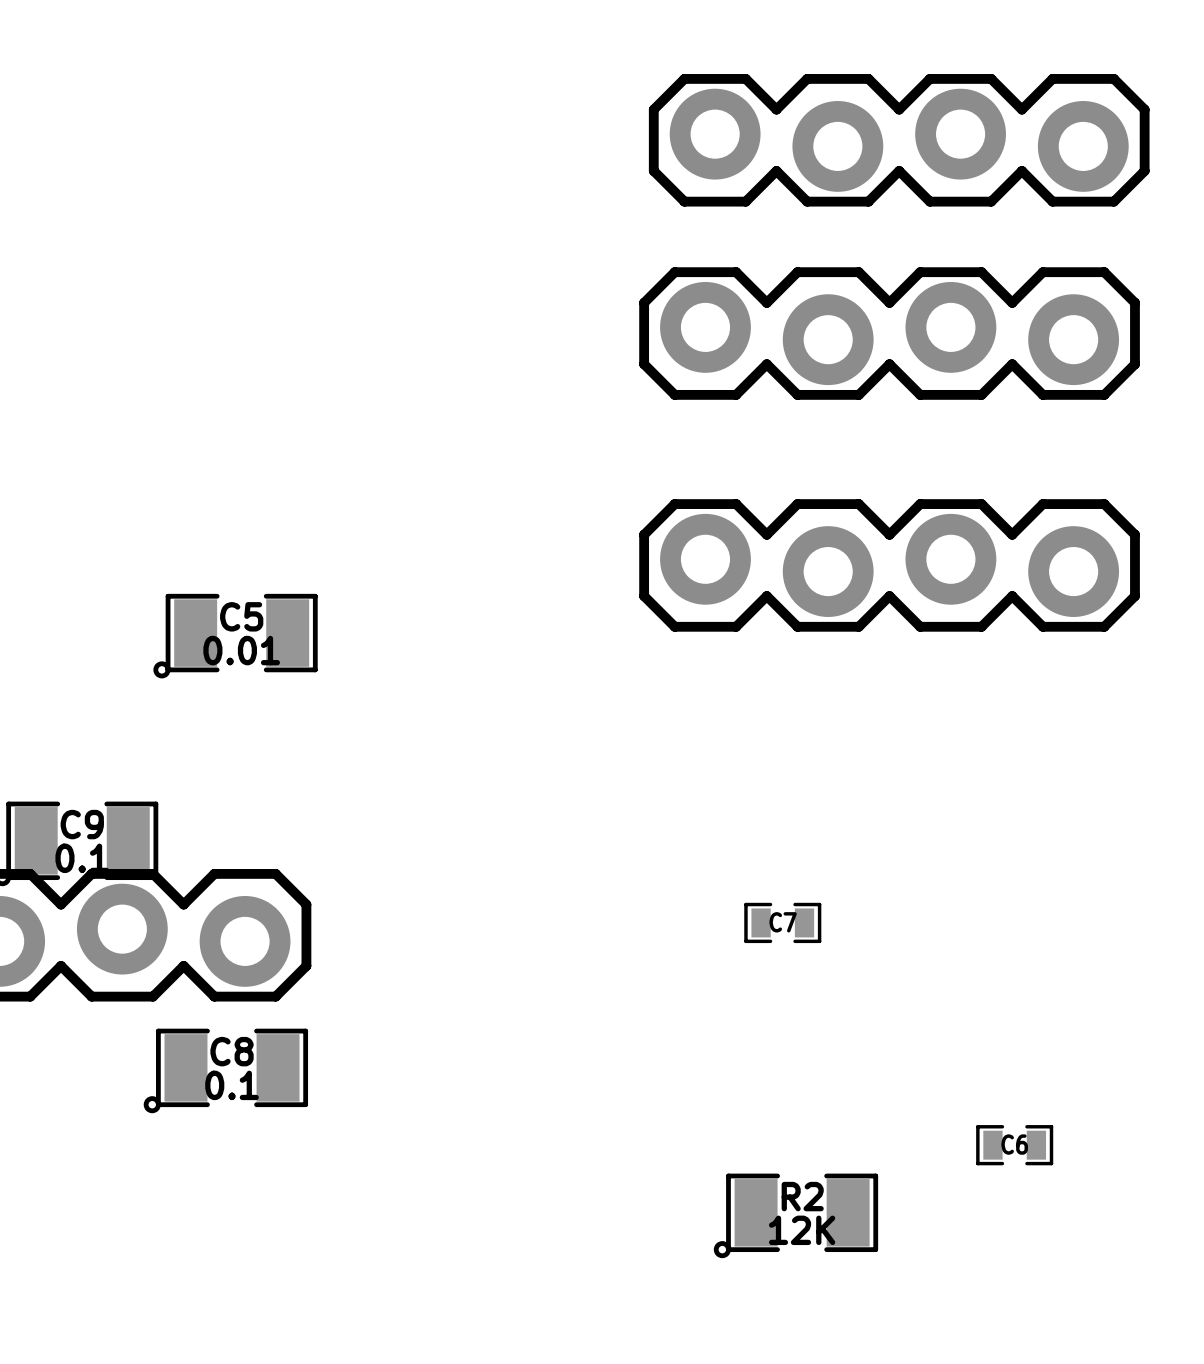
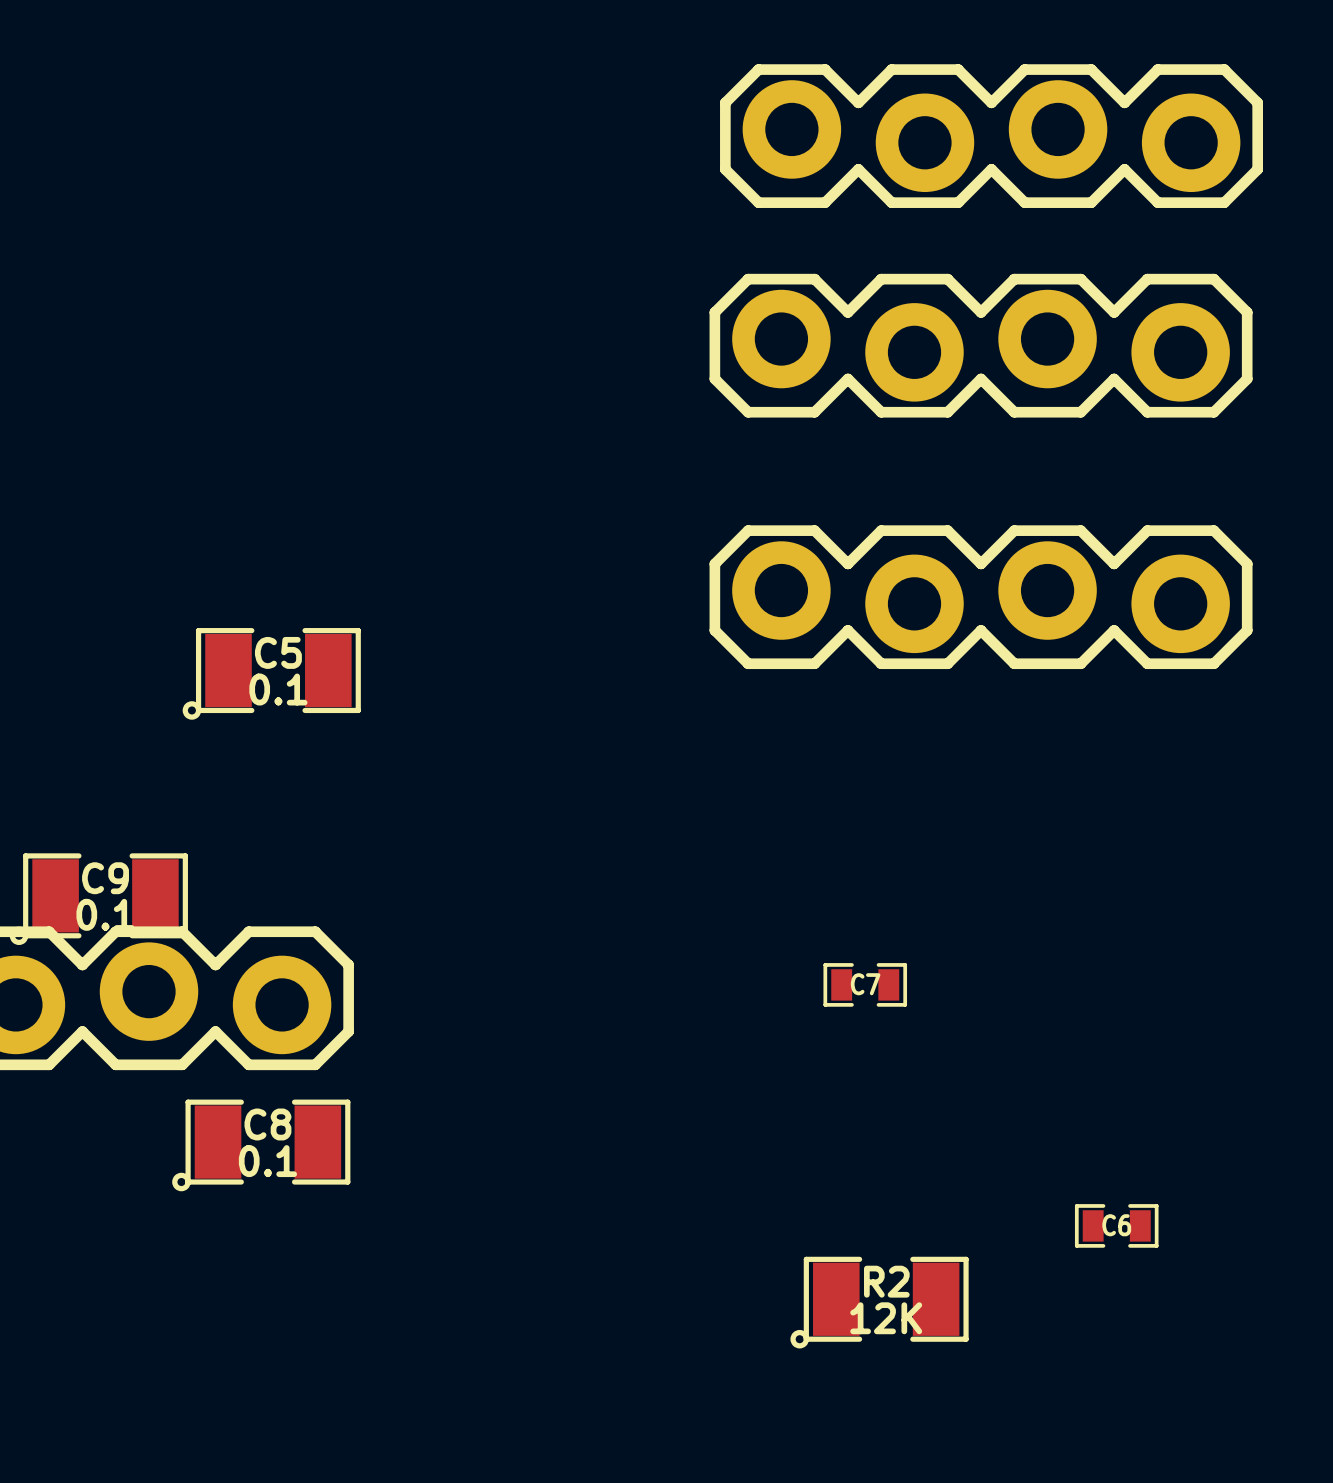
C5 value: 0.01 (241, 650) -> 0.1 (278, 689)

